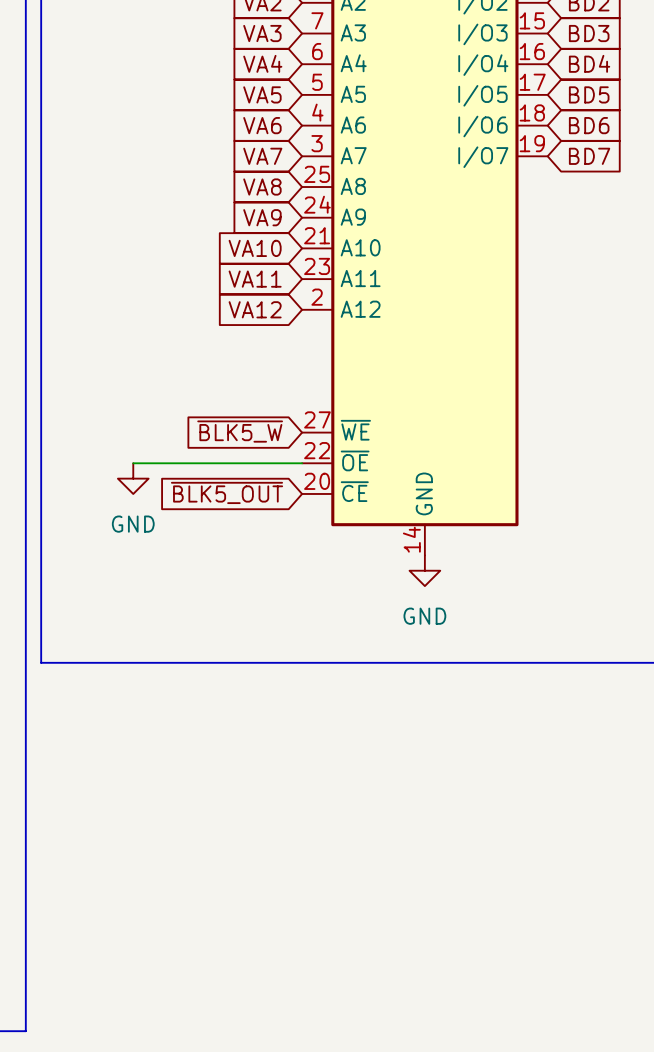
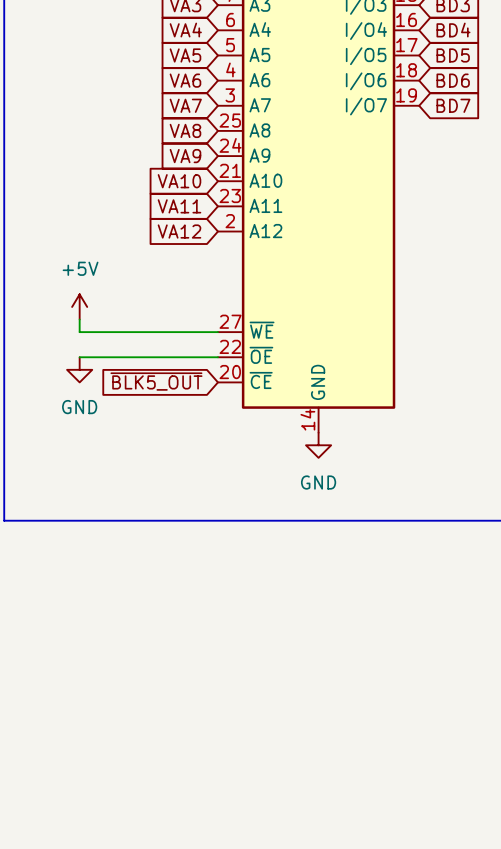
power symbol: none -> +5V (79, 306)
wire: none -> (79, 319) (79, 332) (217, 332)
global label: ~{BLK5_W} (240, 431) -> none

